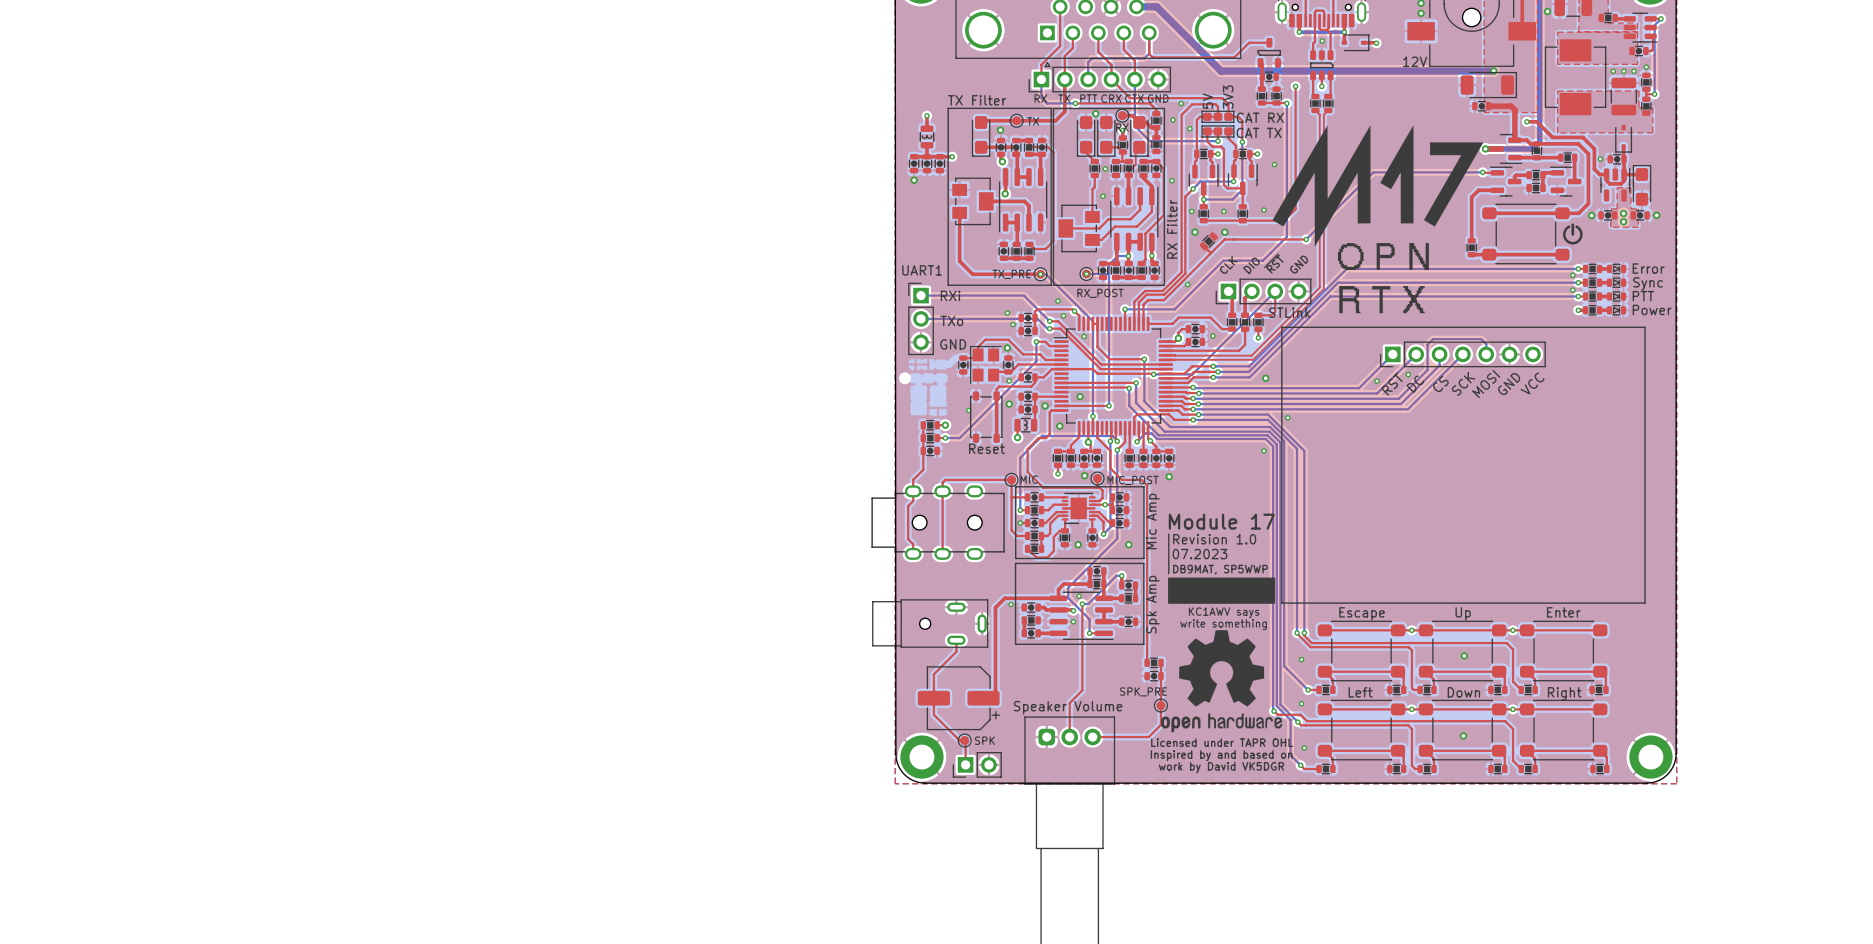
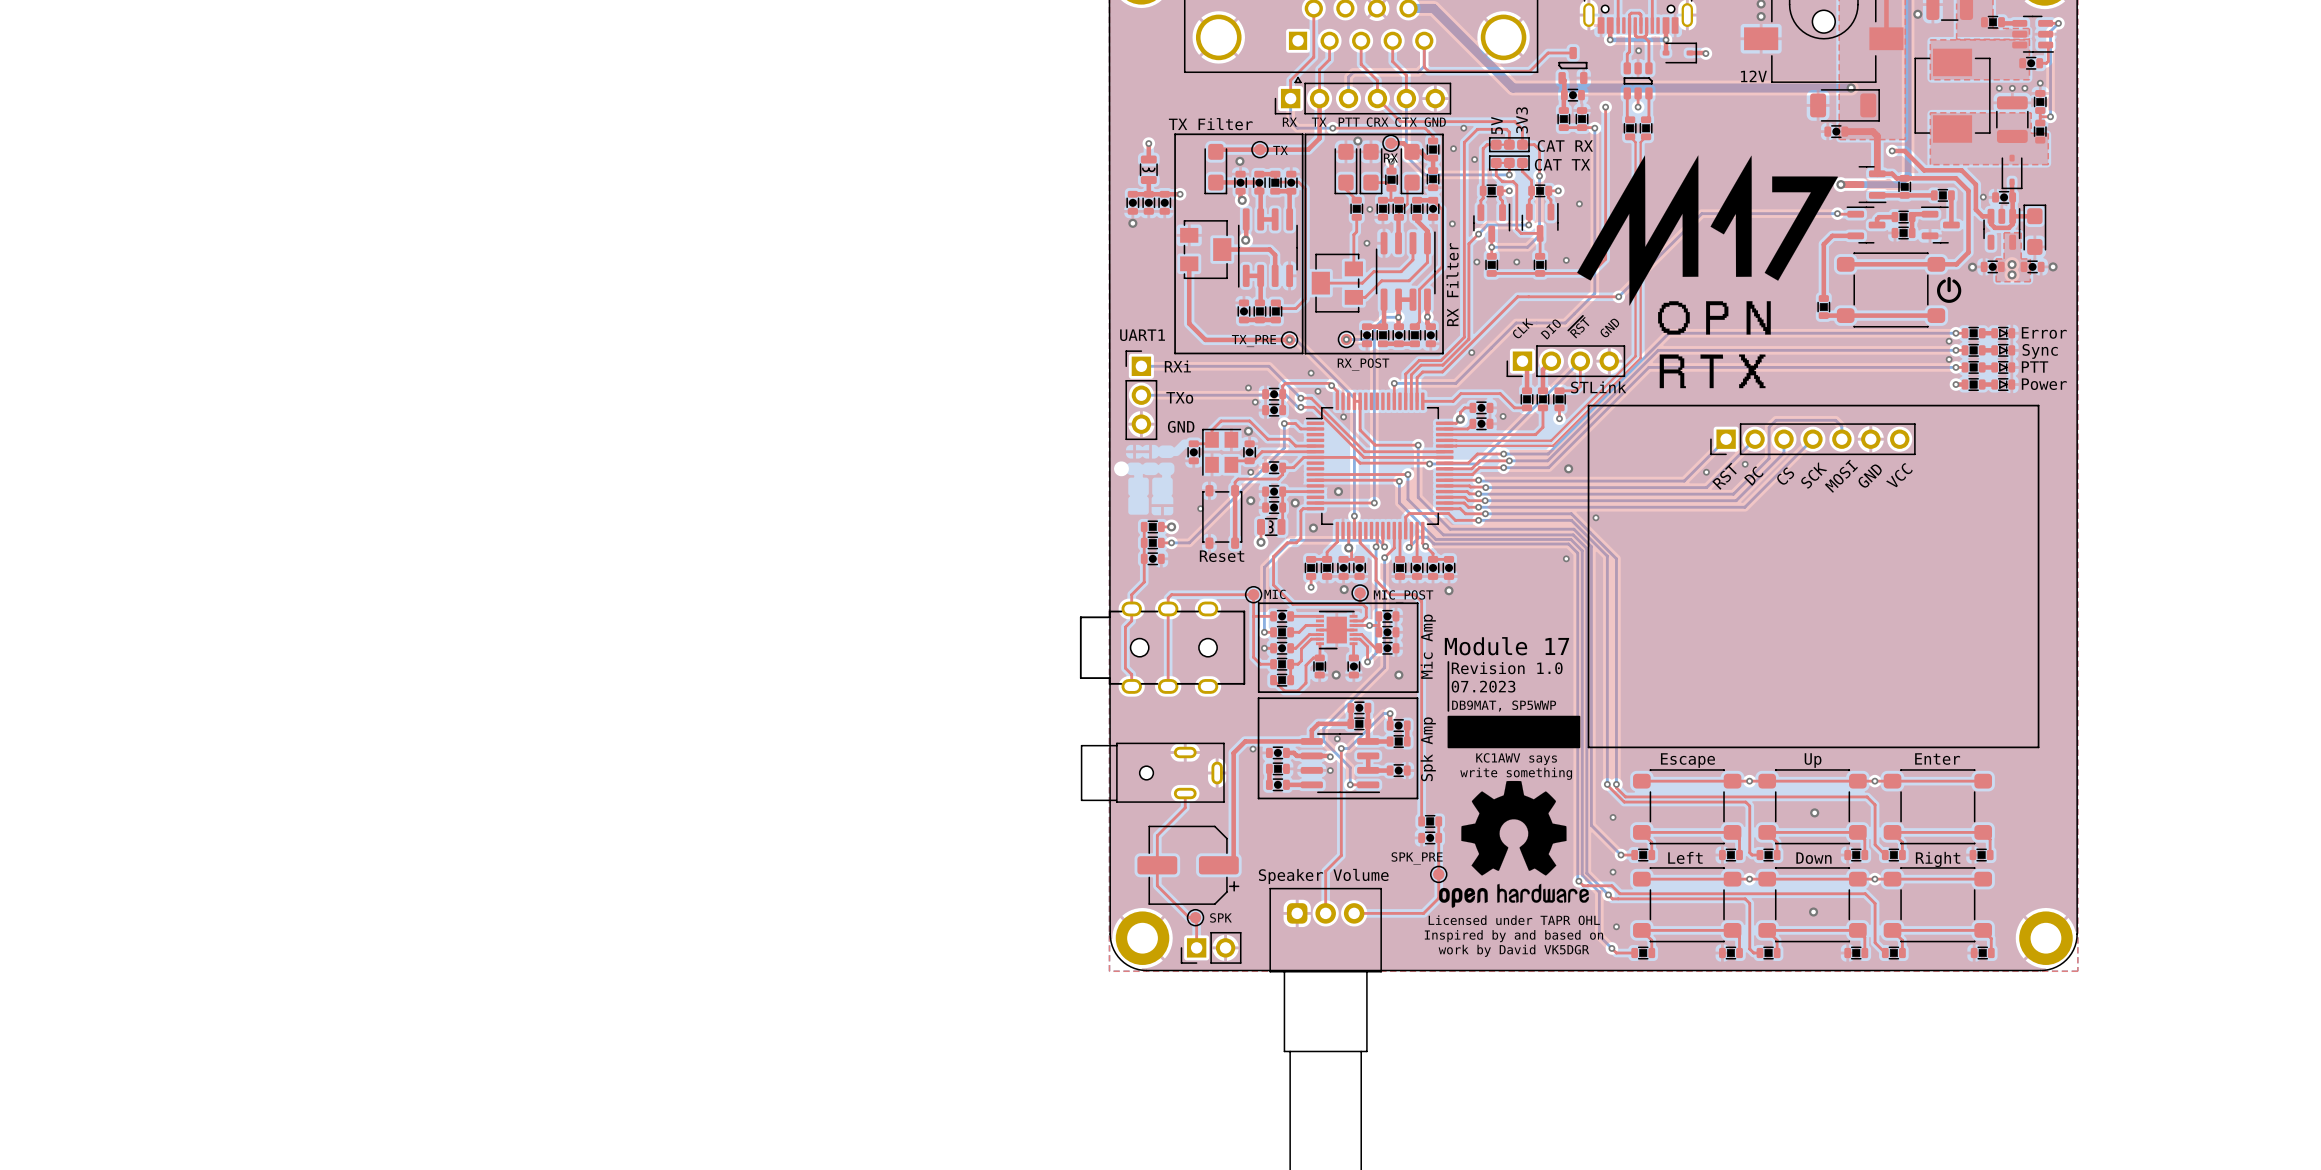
via: (1194, 232) -> none
via: (1224, 232) -> none
part: (1208, 241) -> none
top track: (1203, 246) (1211, 252) -> none

